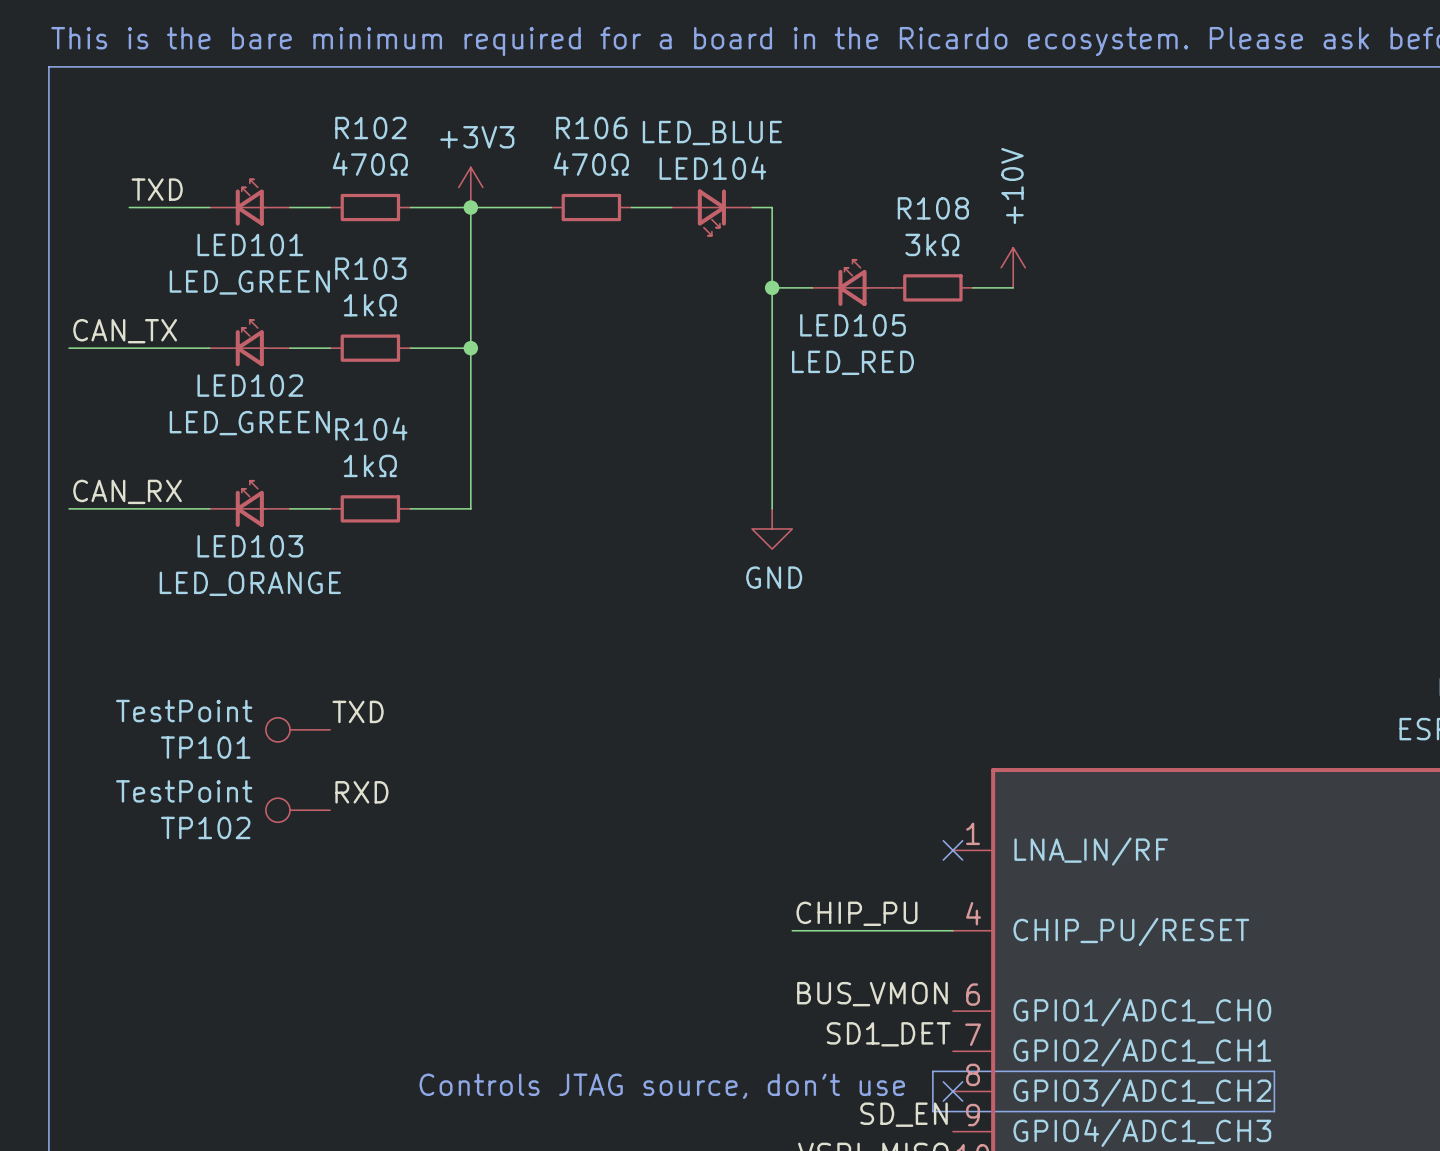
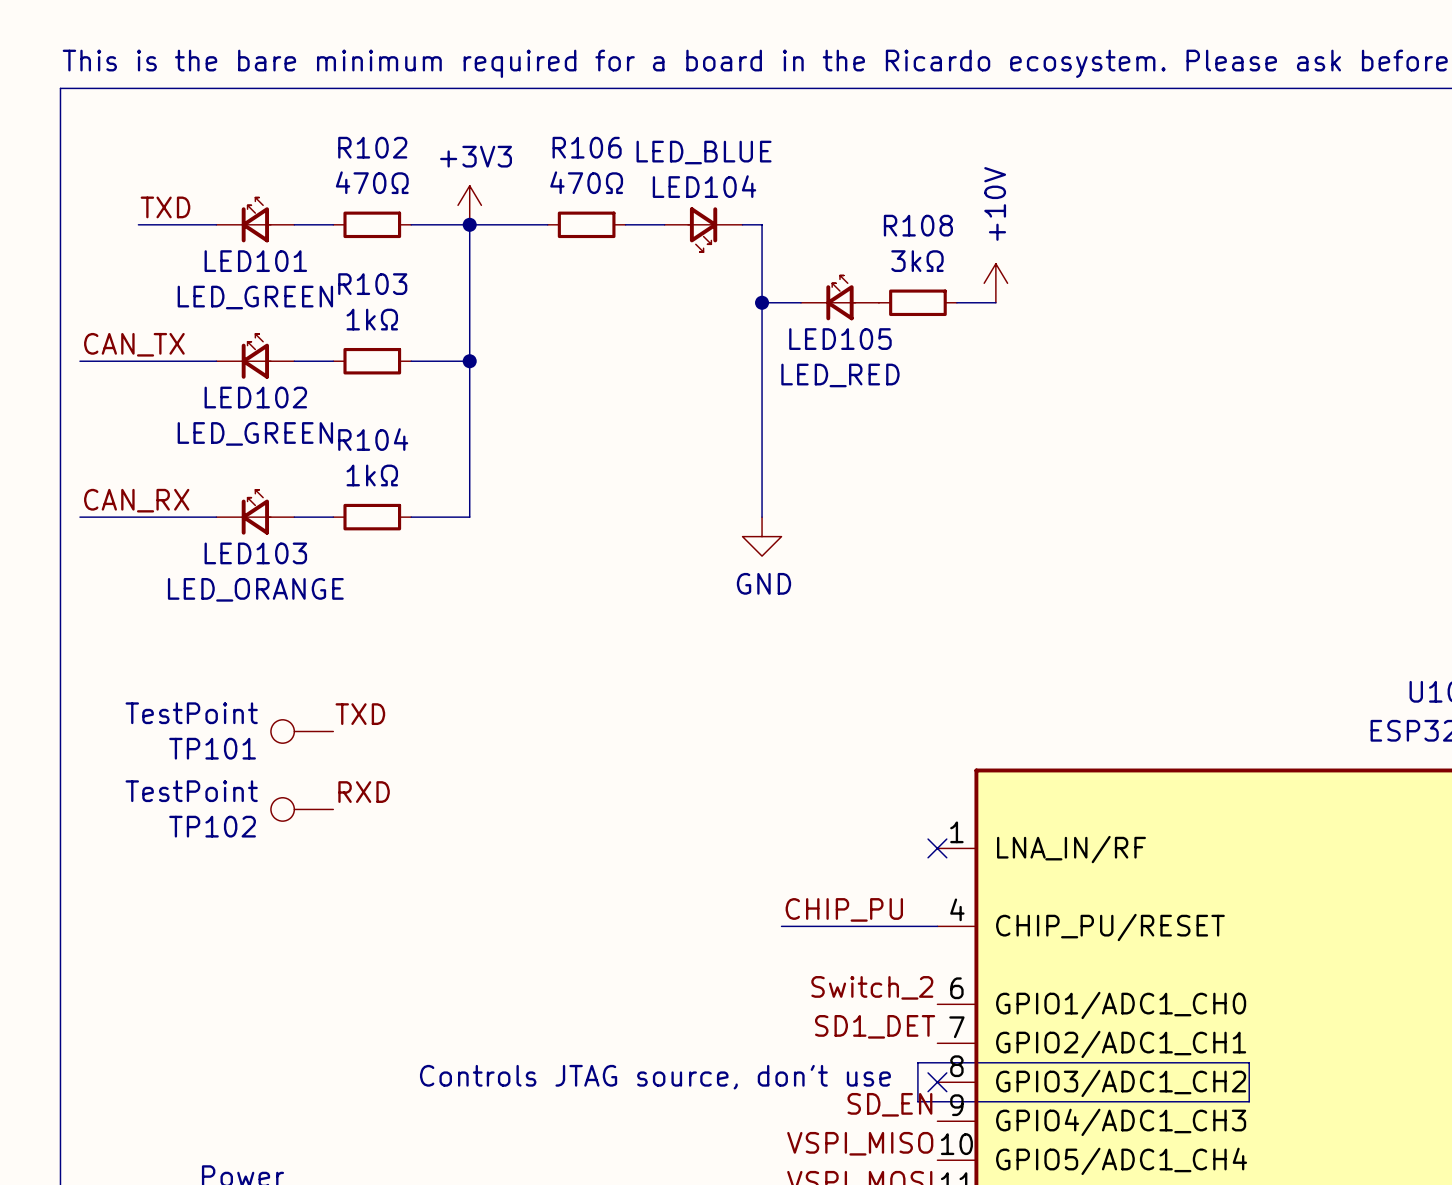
label: BUS_VMON (872, 994) -> Switch_2 (872, 987)

